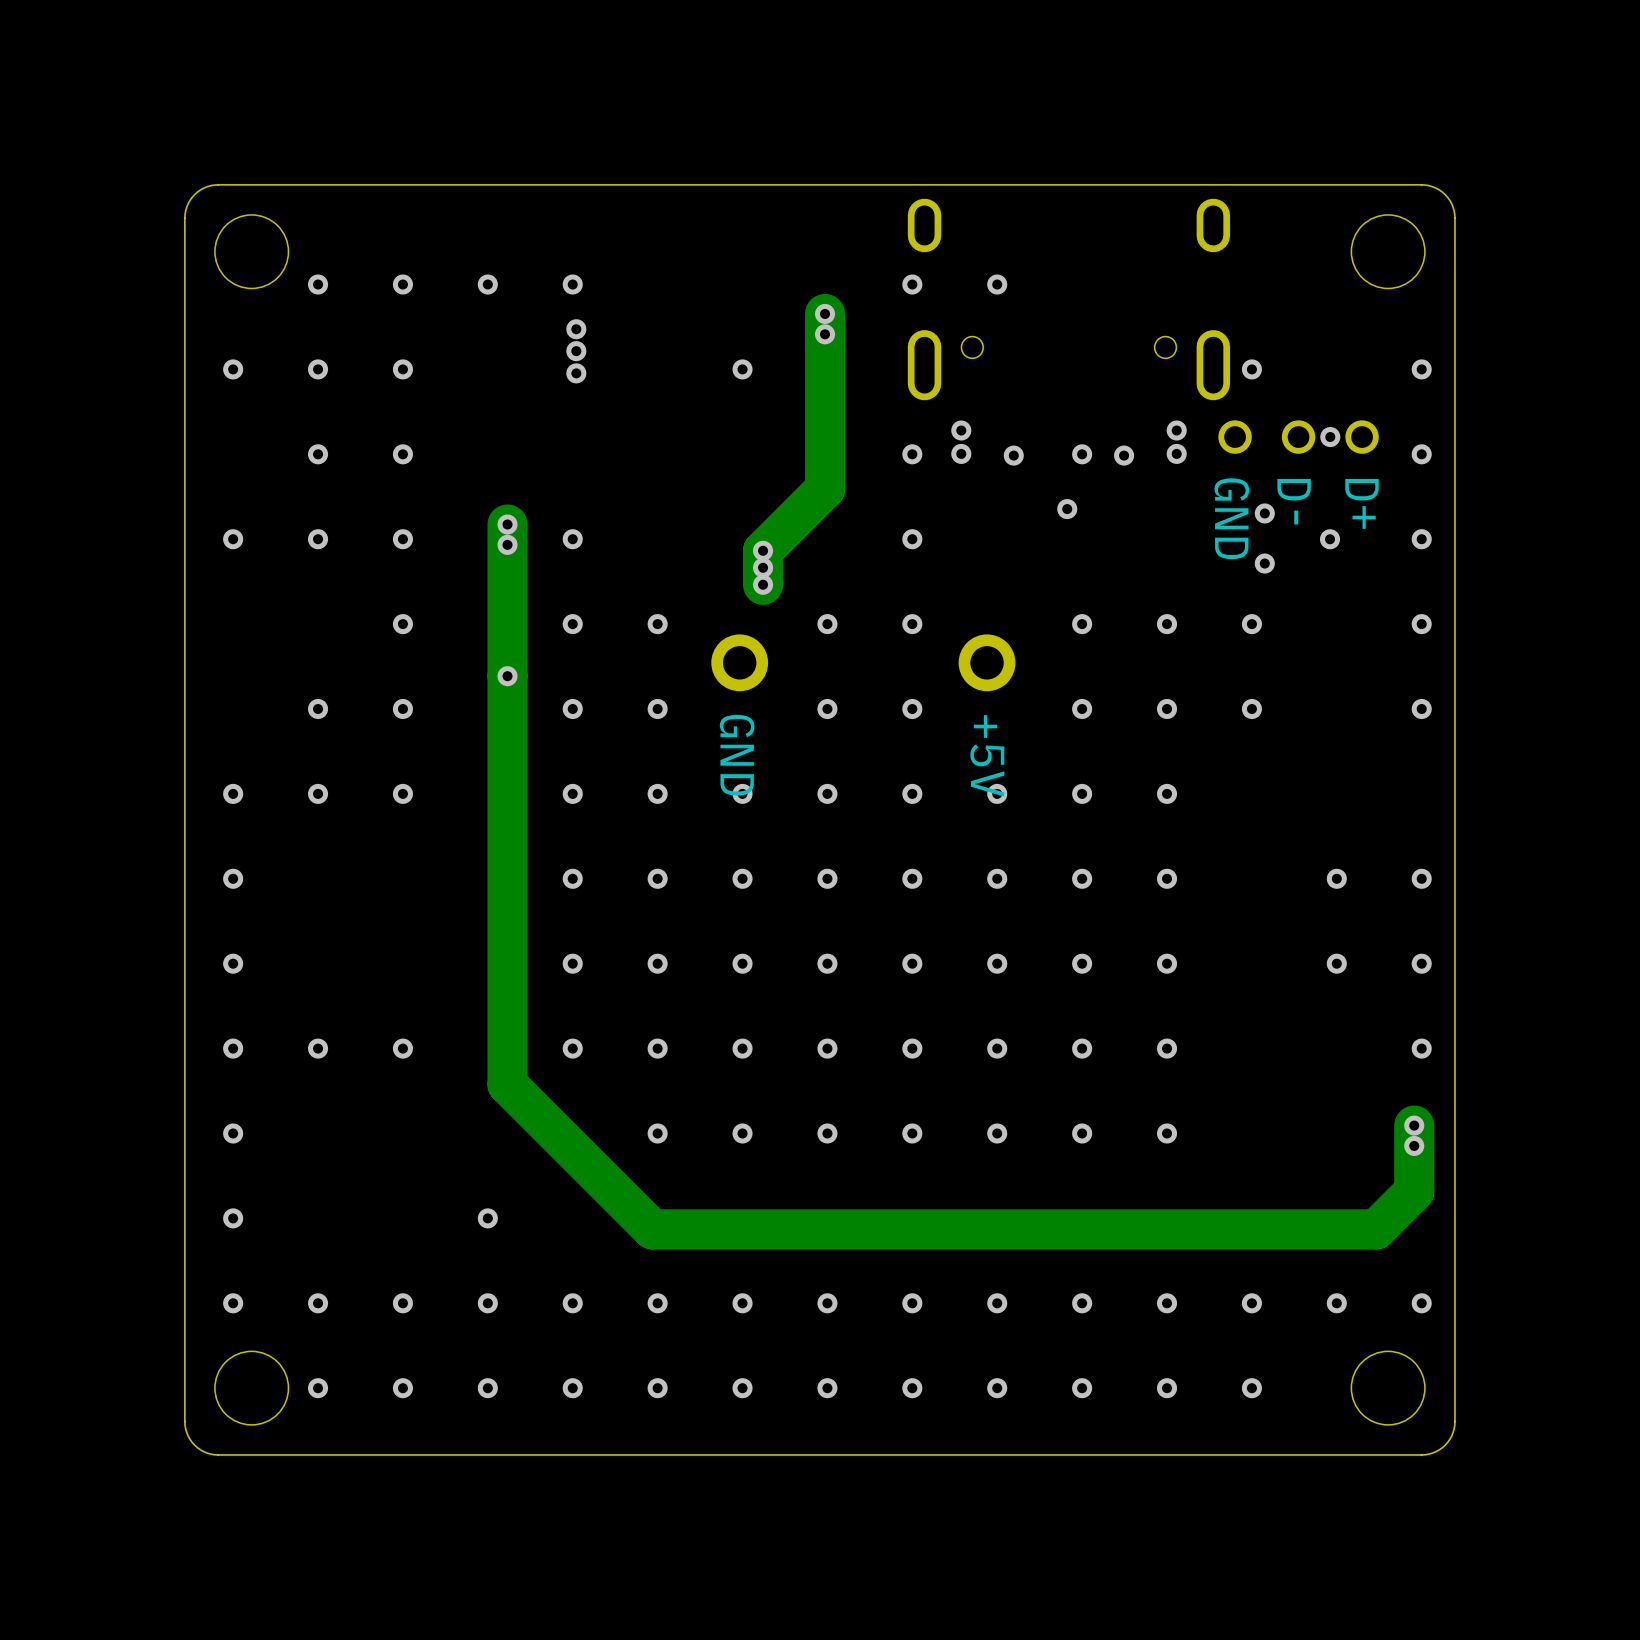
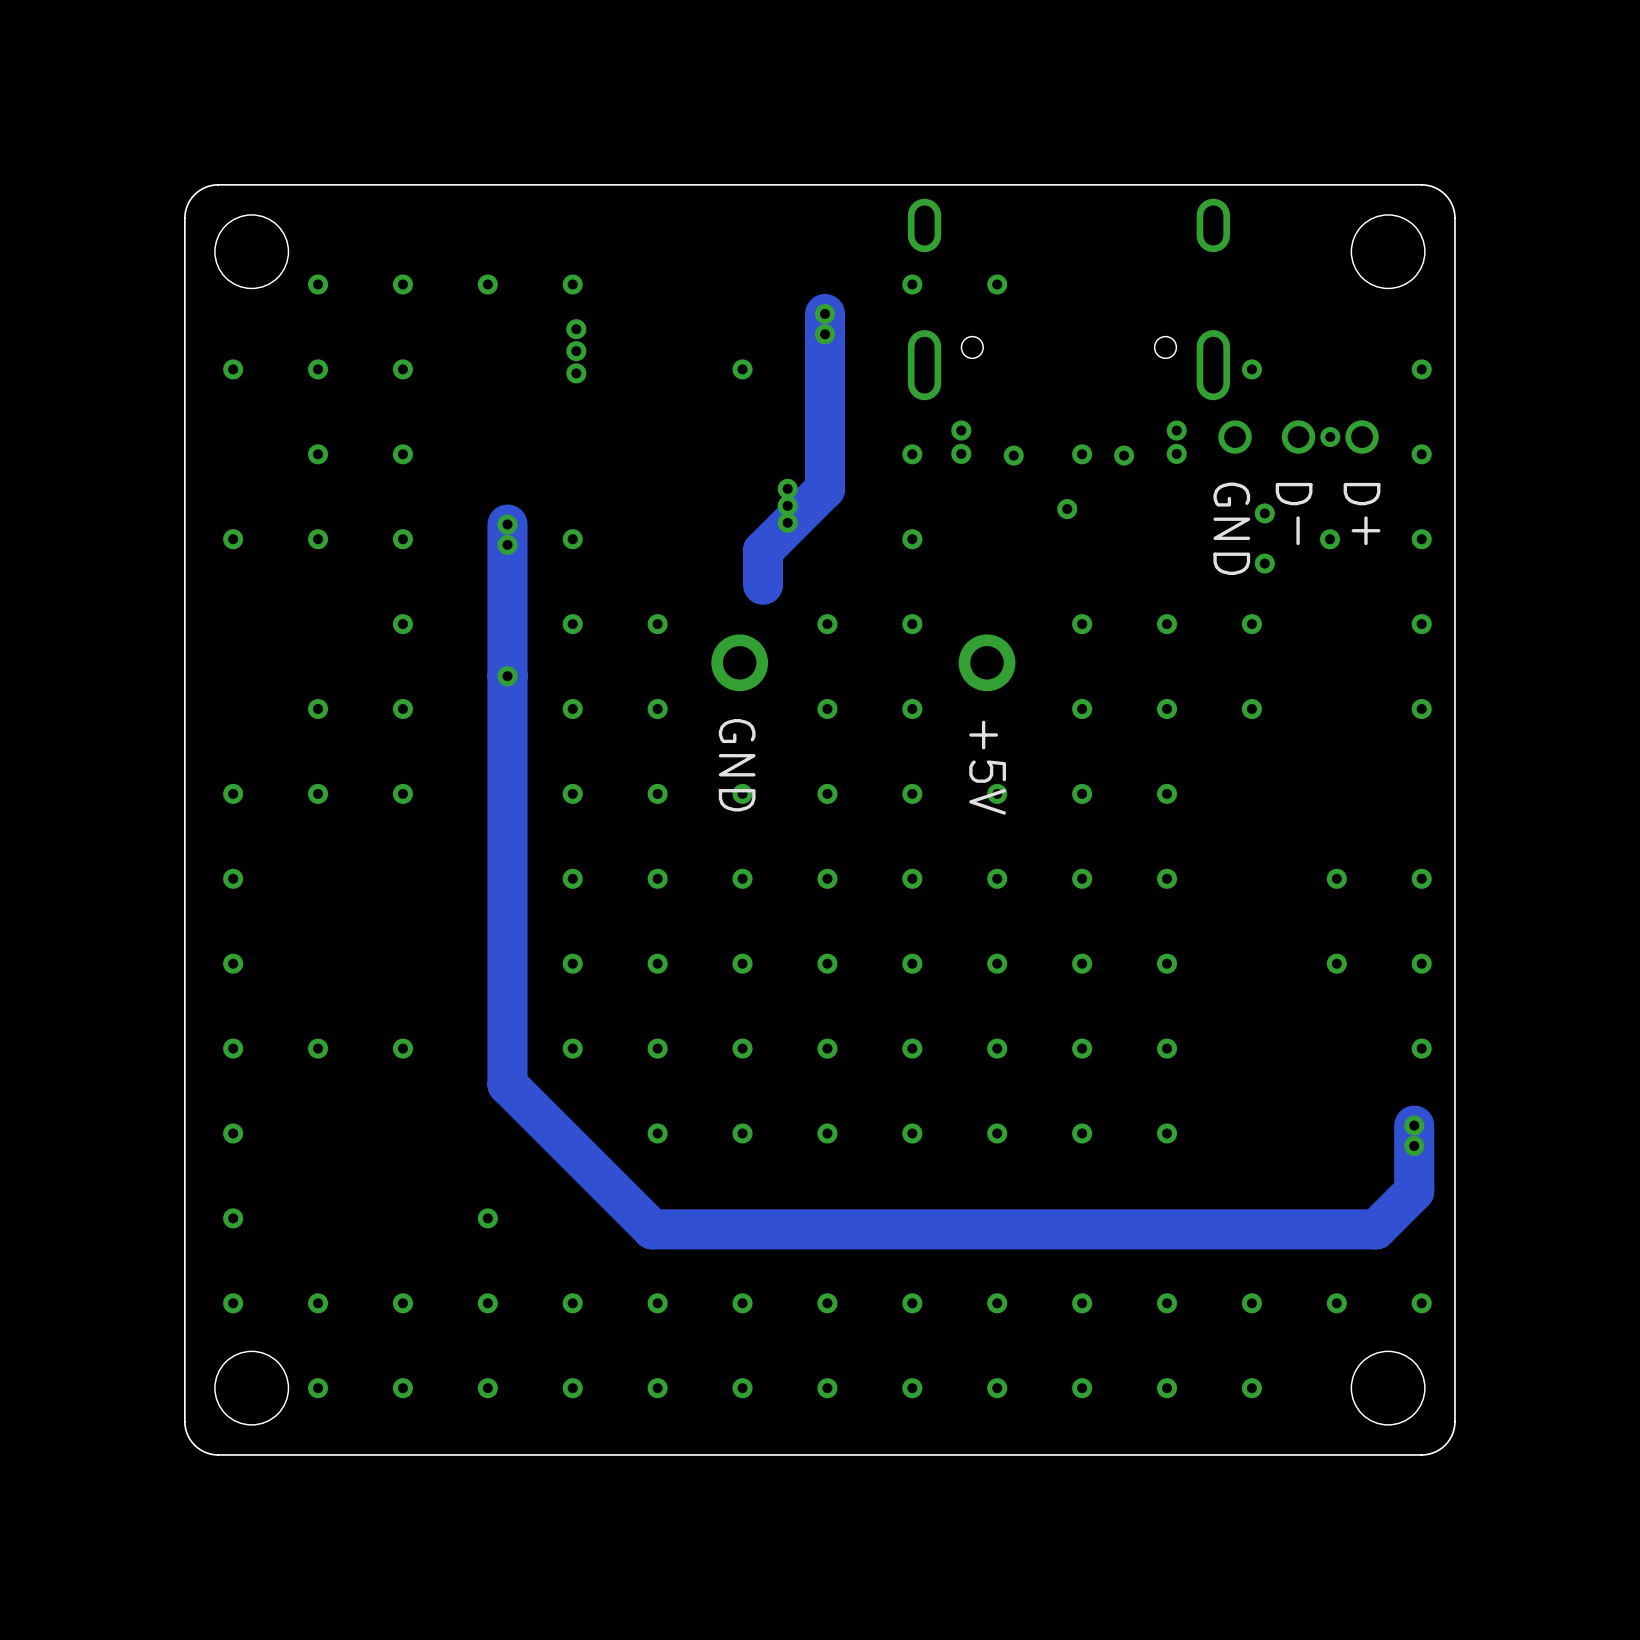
via: none -> (787, 488)
via: none -> (787, 505)
via: none -> (787, 522)
via: (763, 550) -> none
via: (763, 567) -> none
via: (763, 584) -> none

